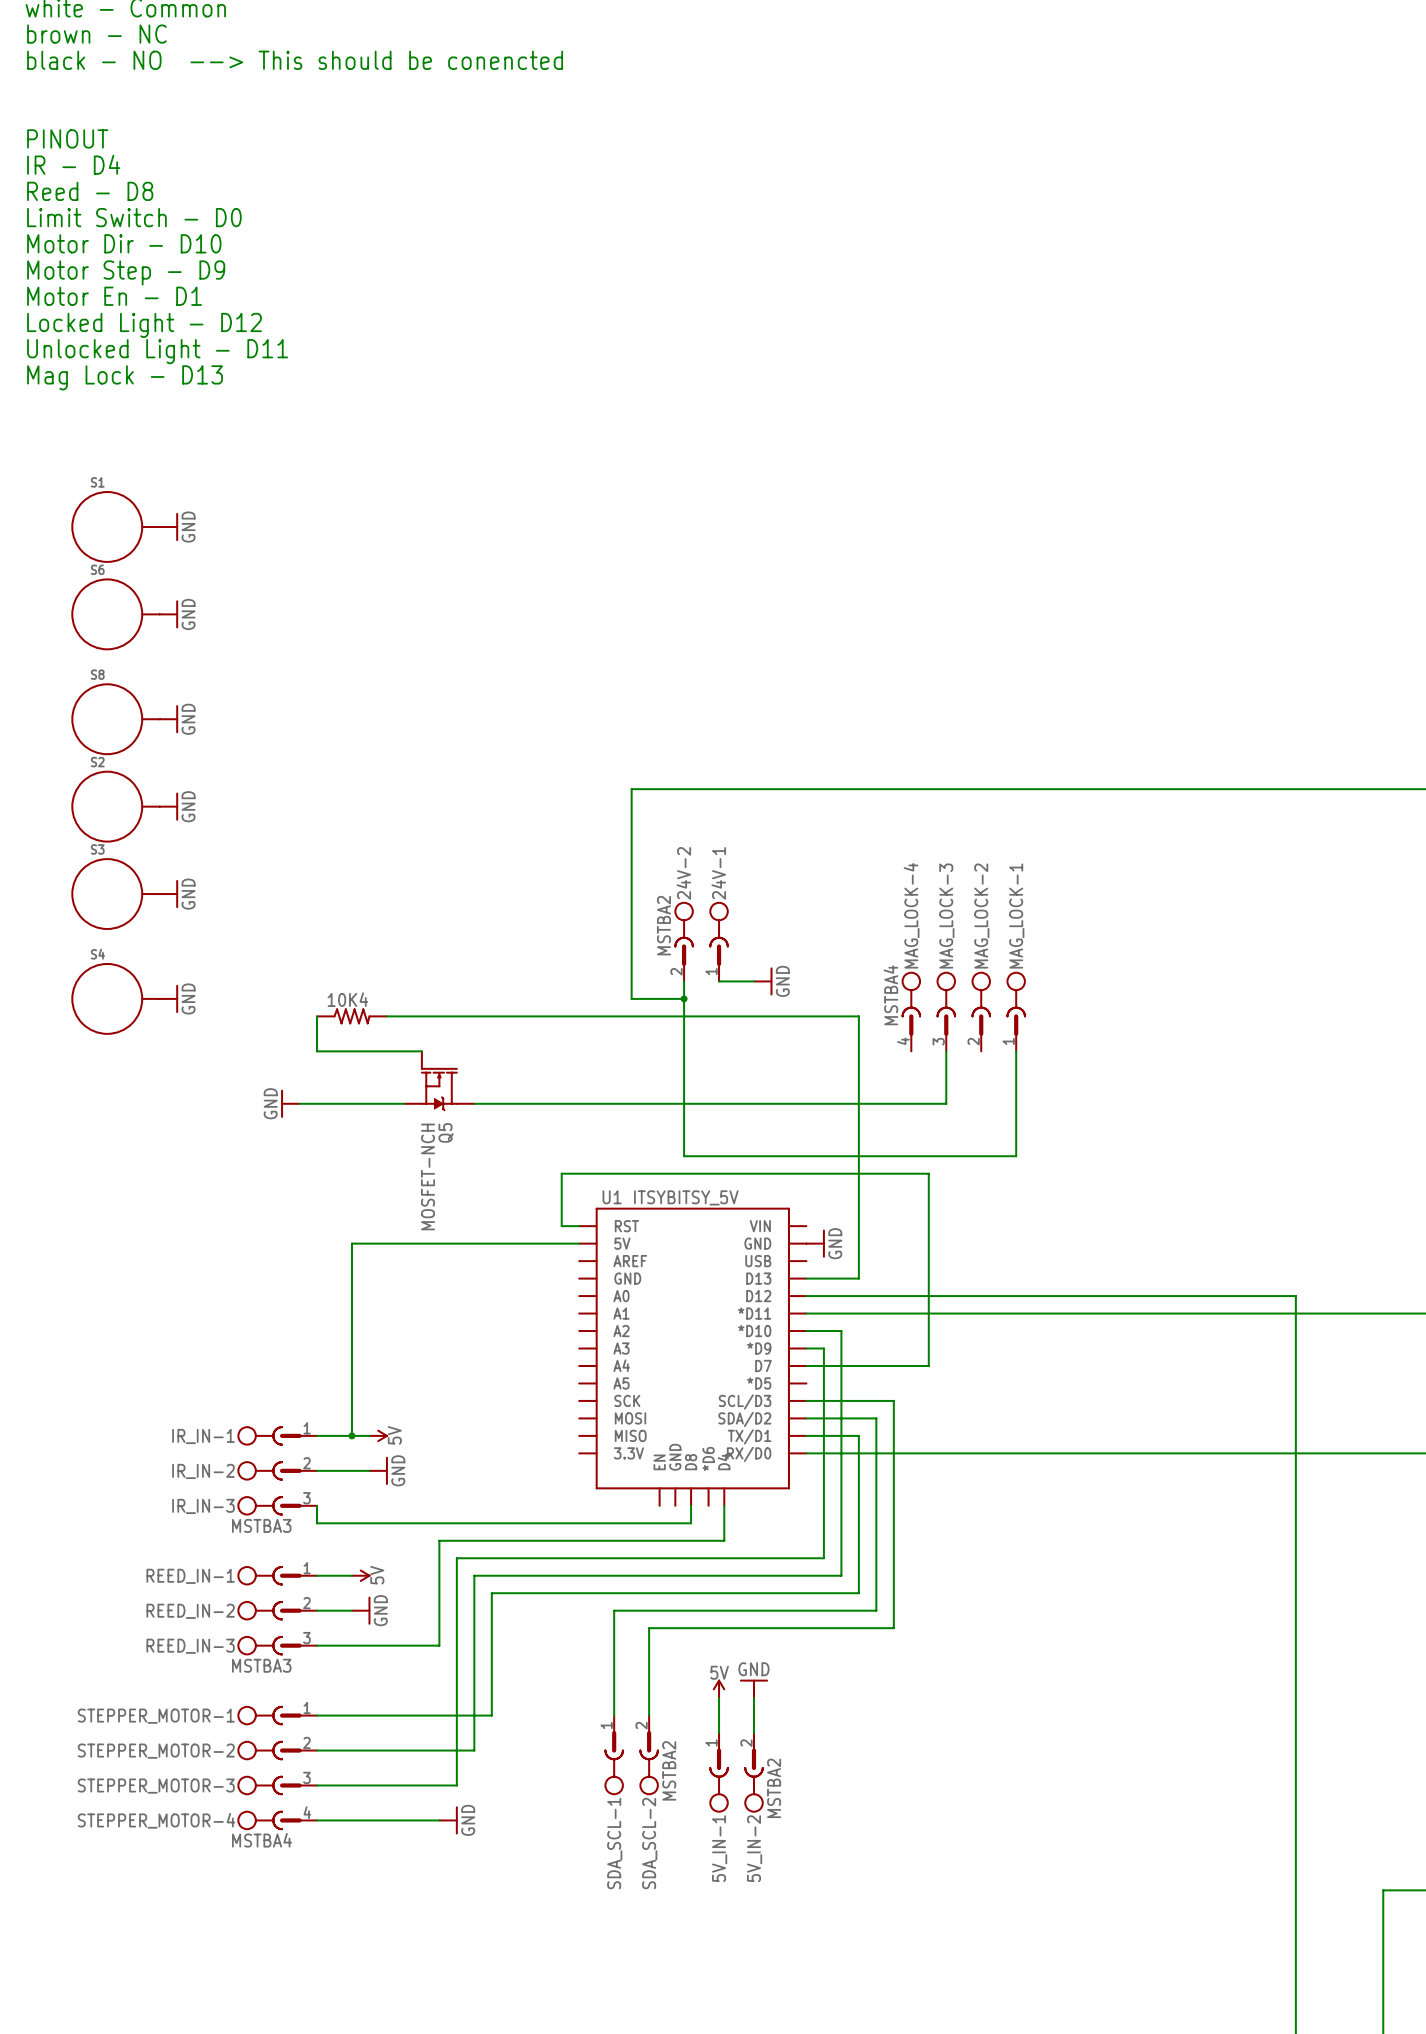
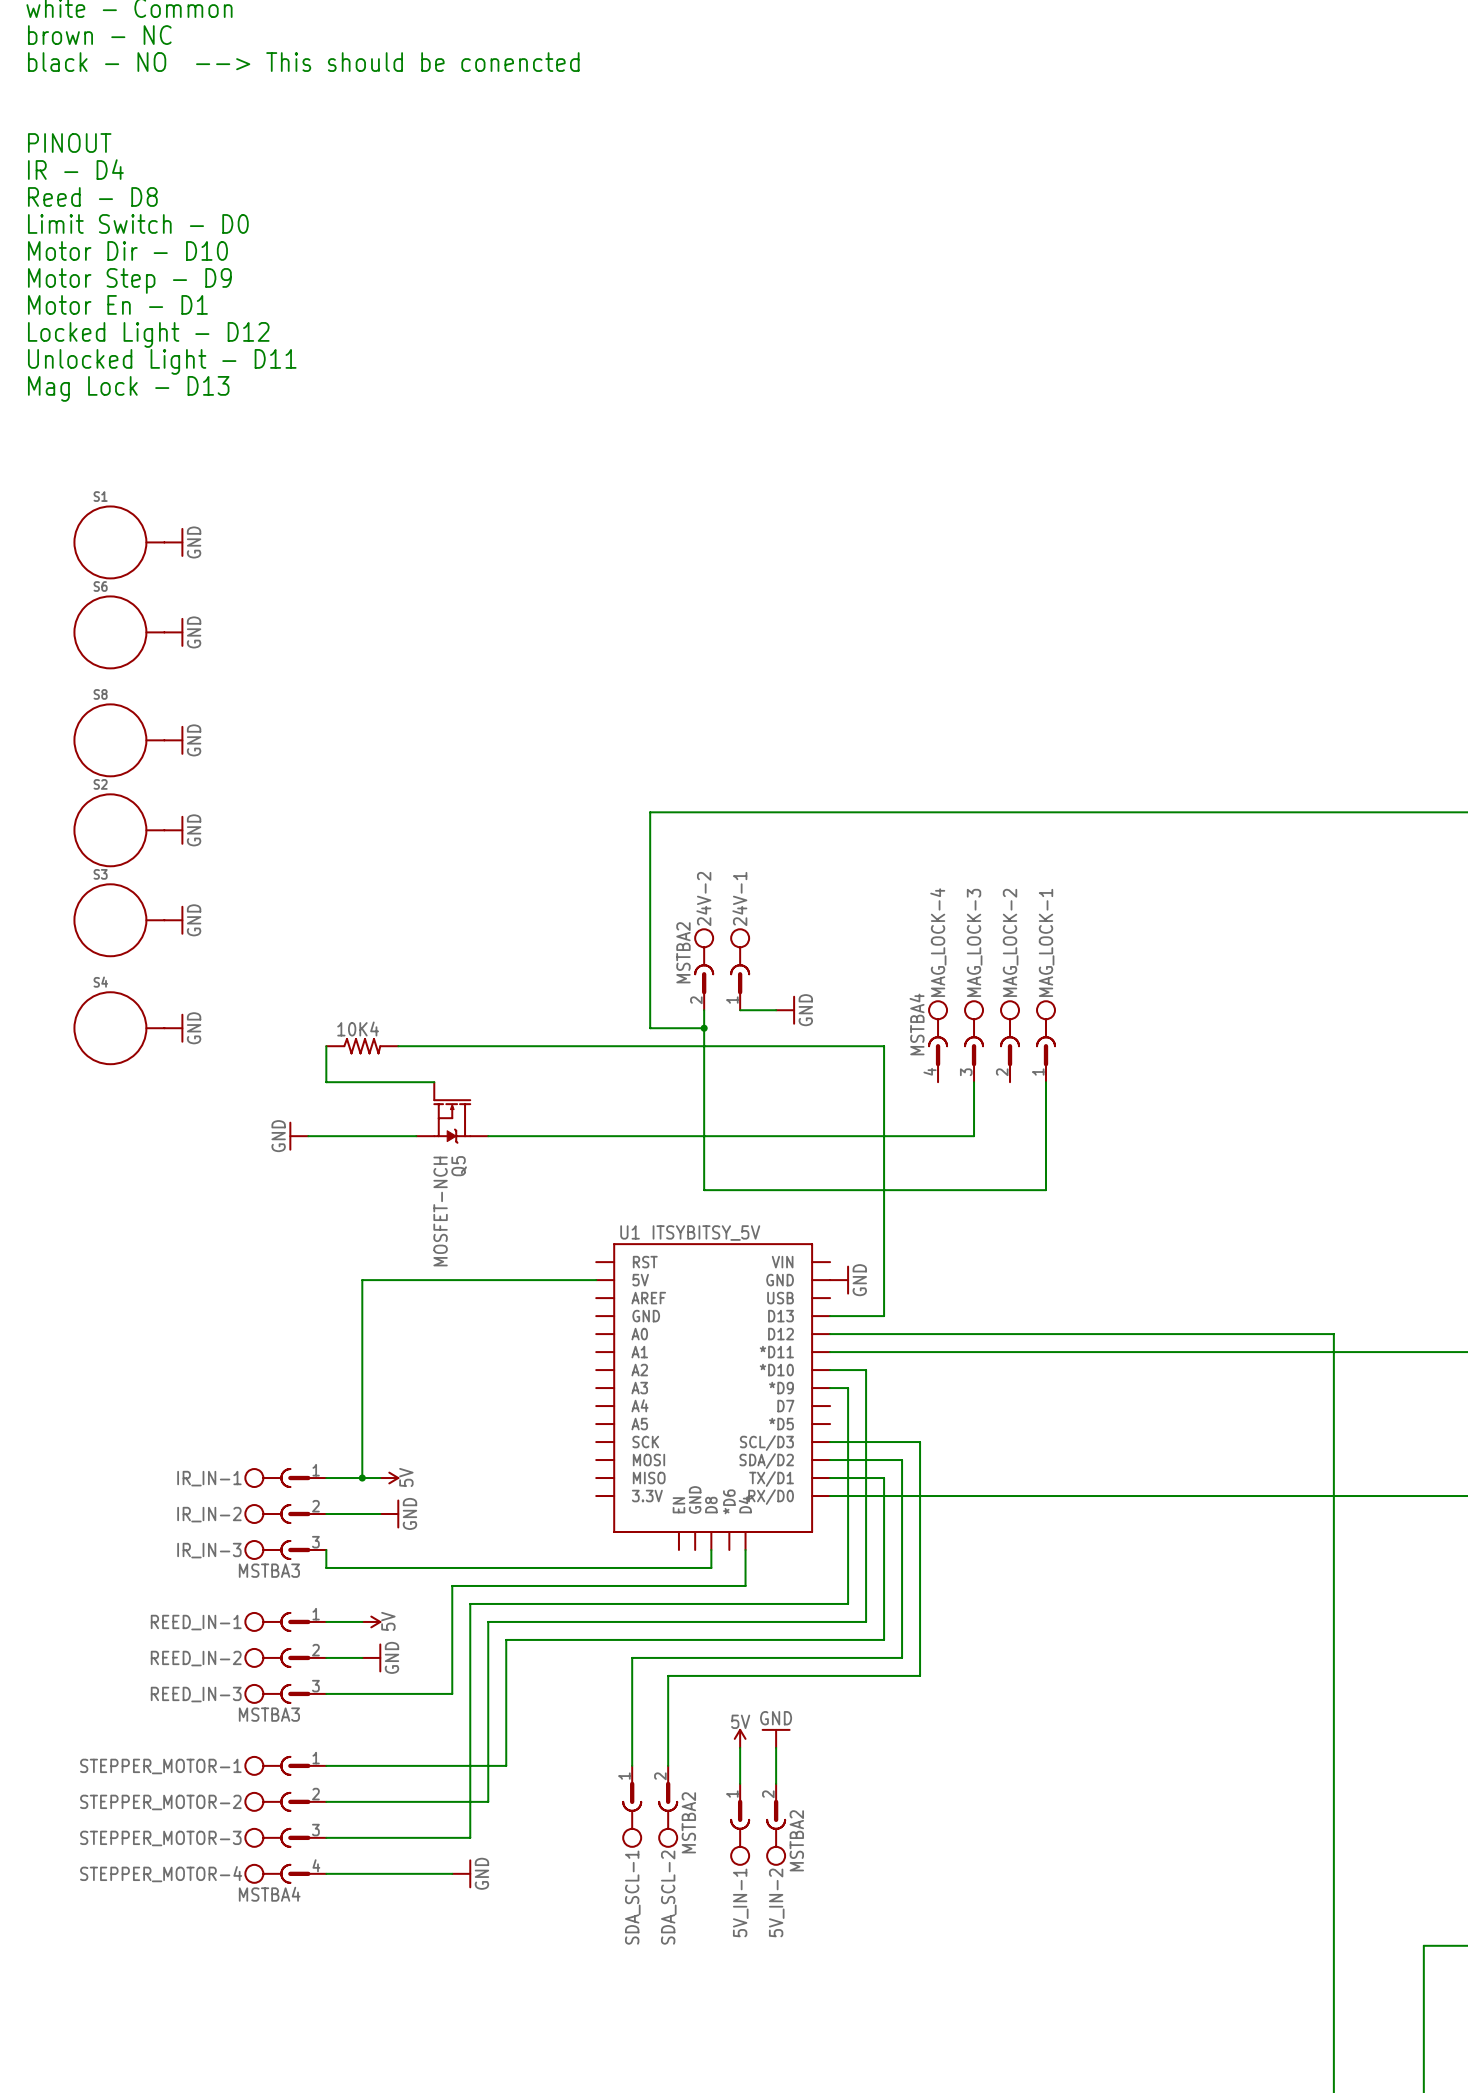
wire: (579, 1226) (561, 1226) (561, 1173) (928, 1173) (928, 1365) (806, 1365) -> none

